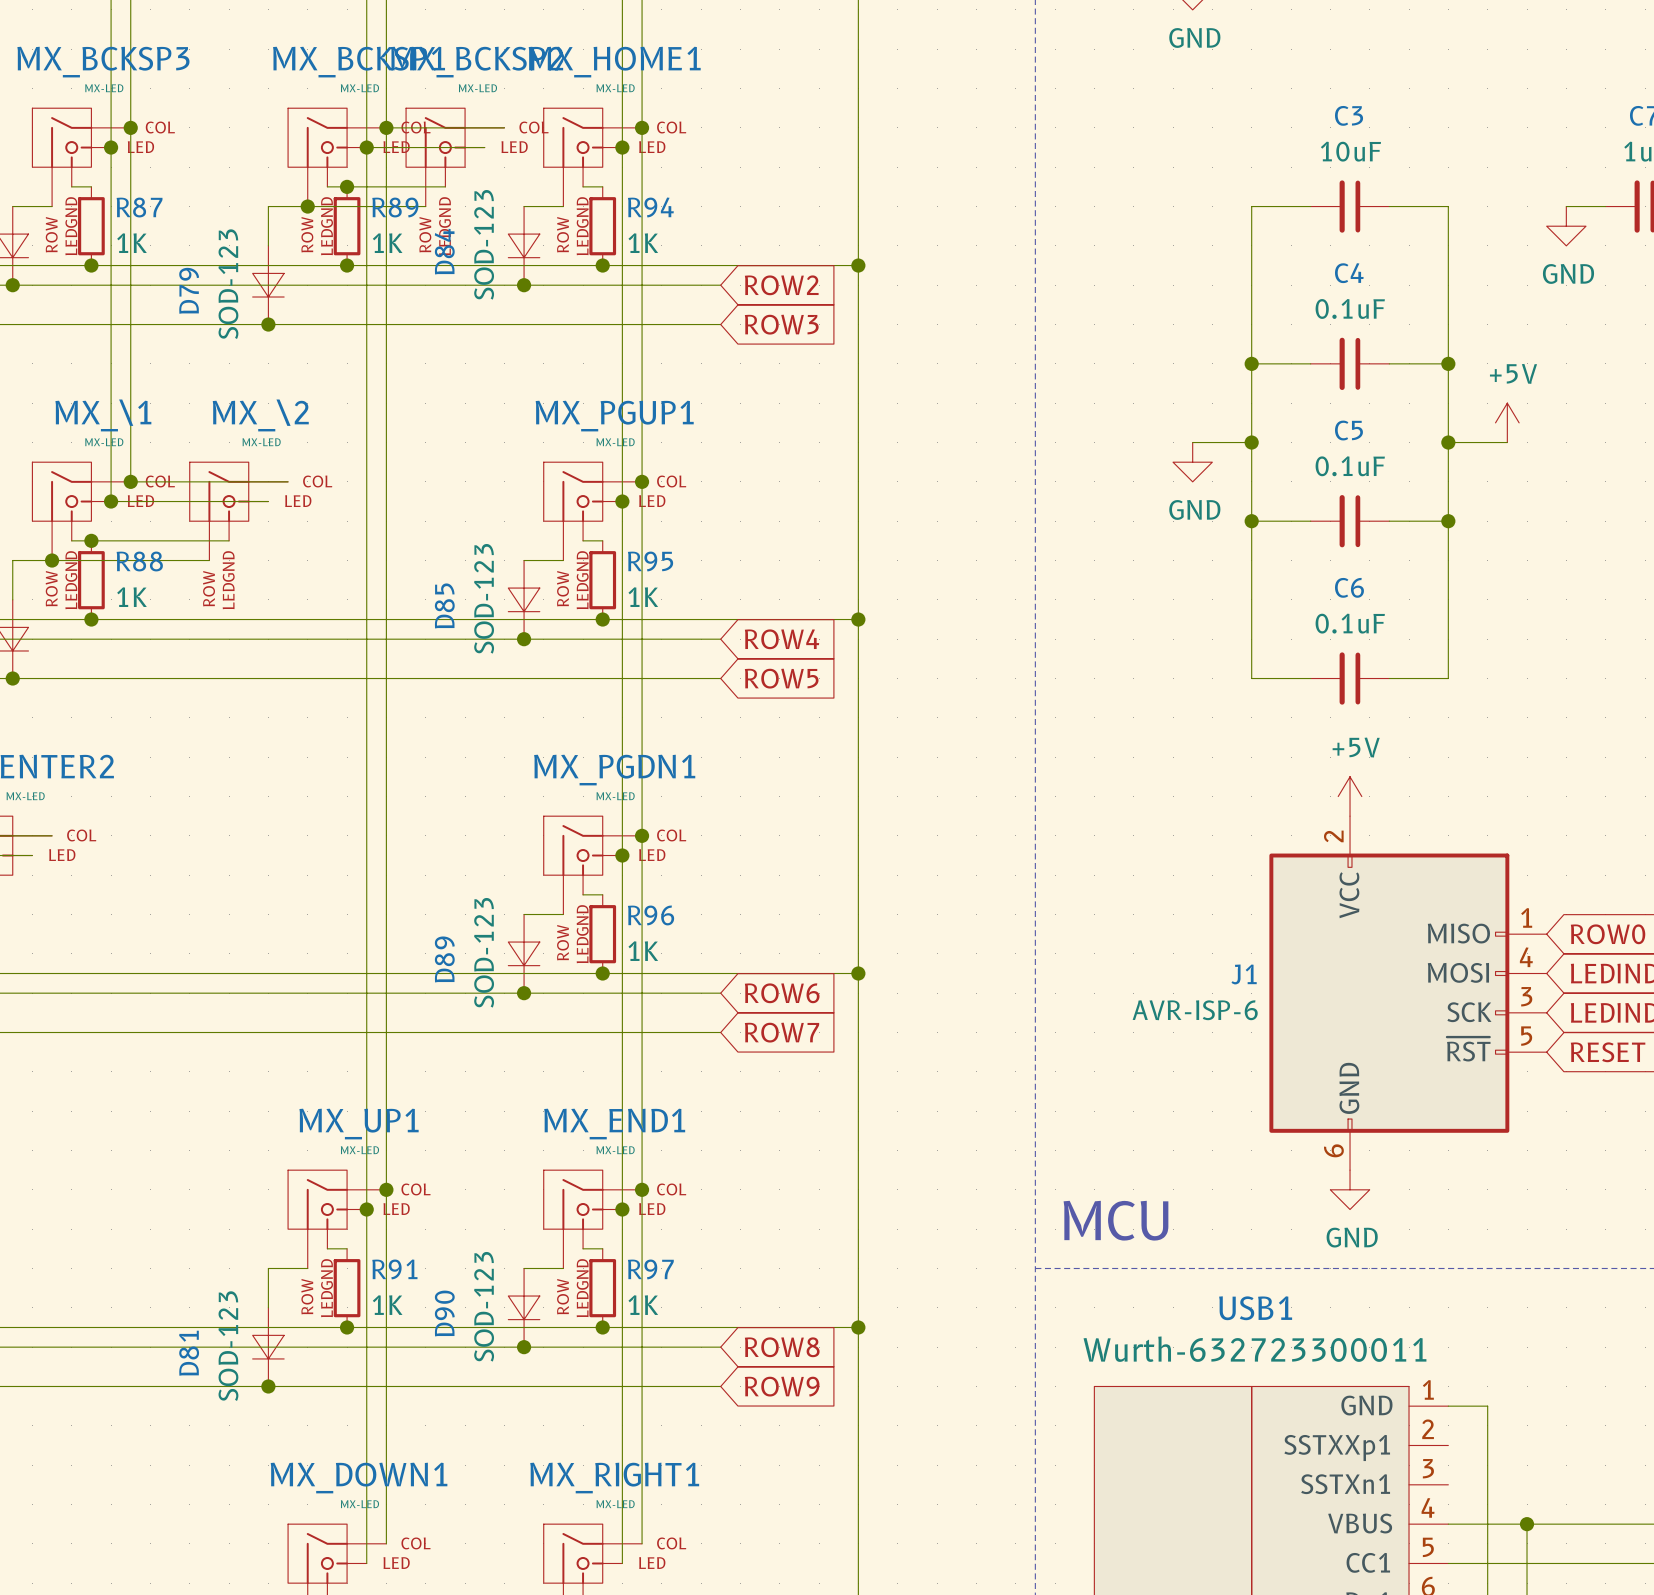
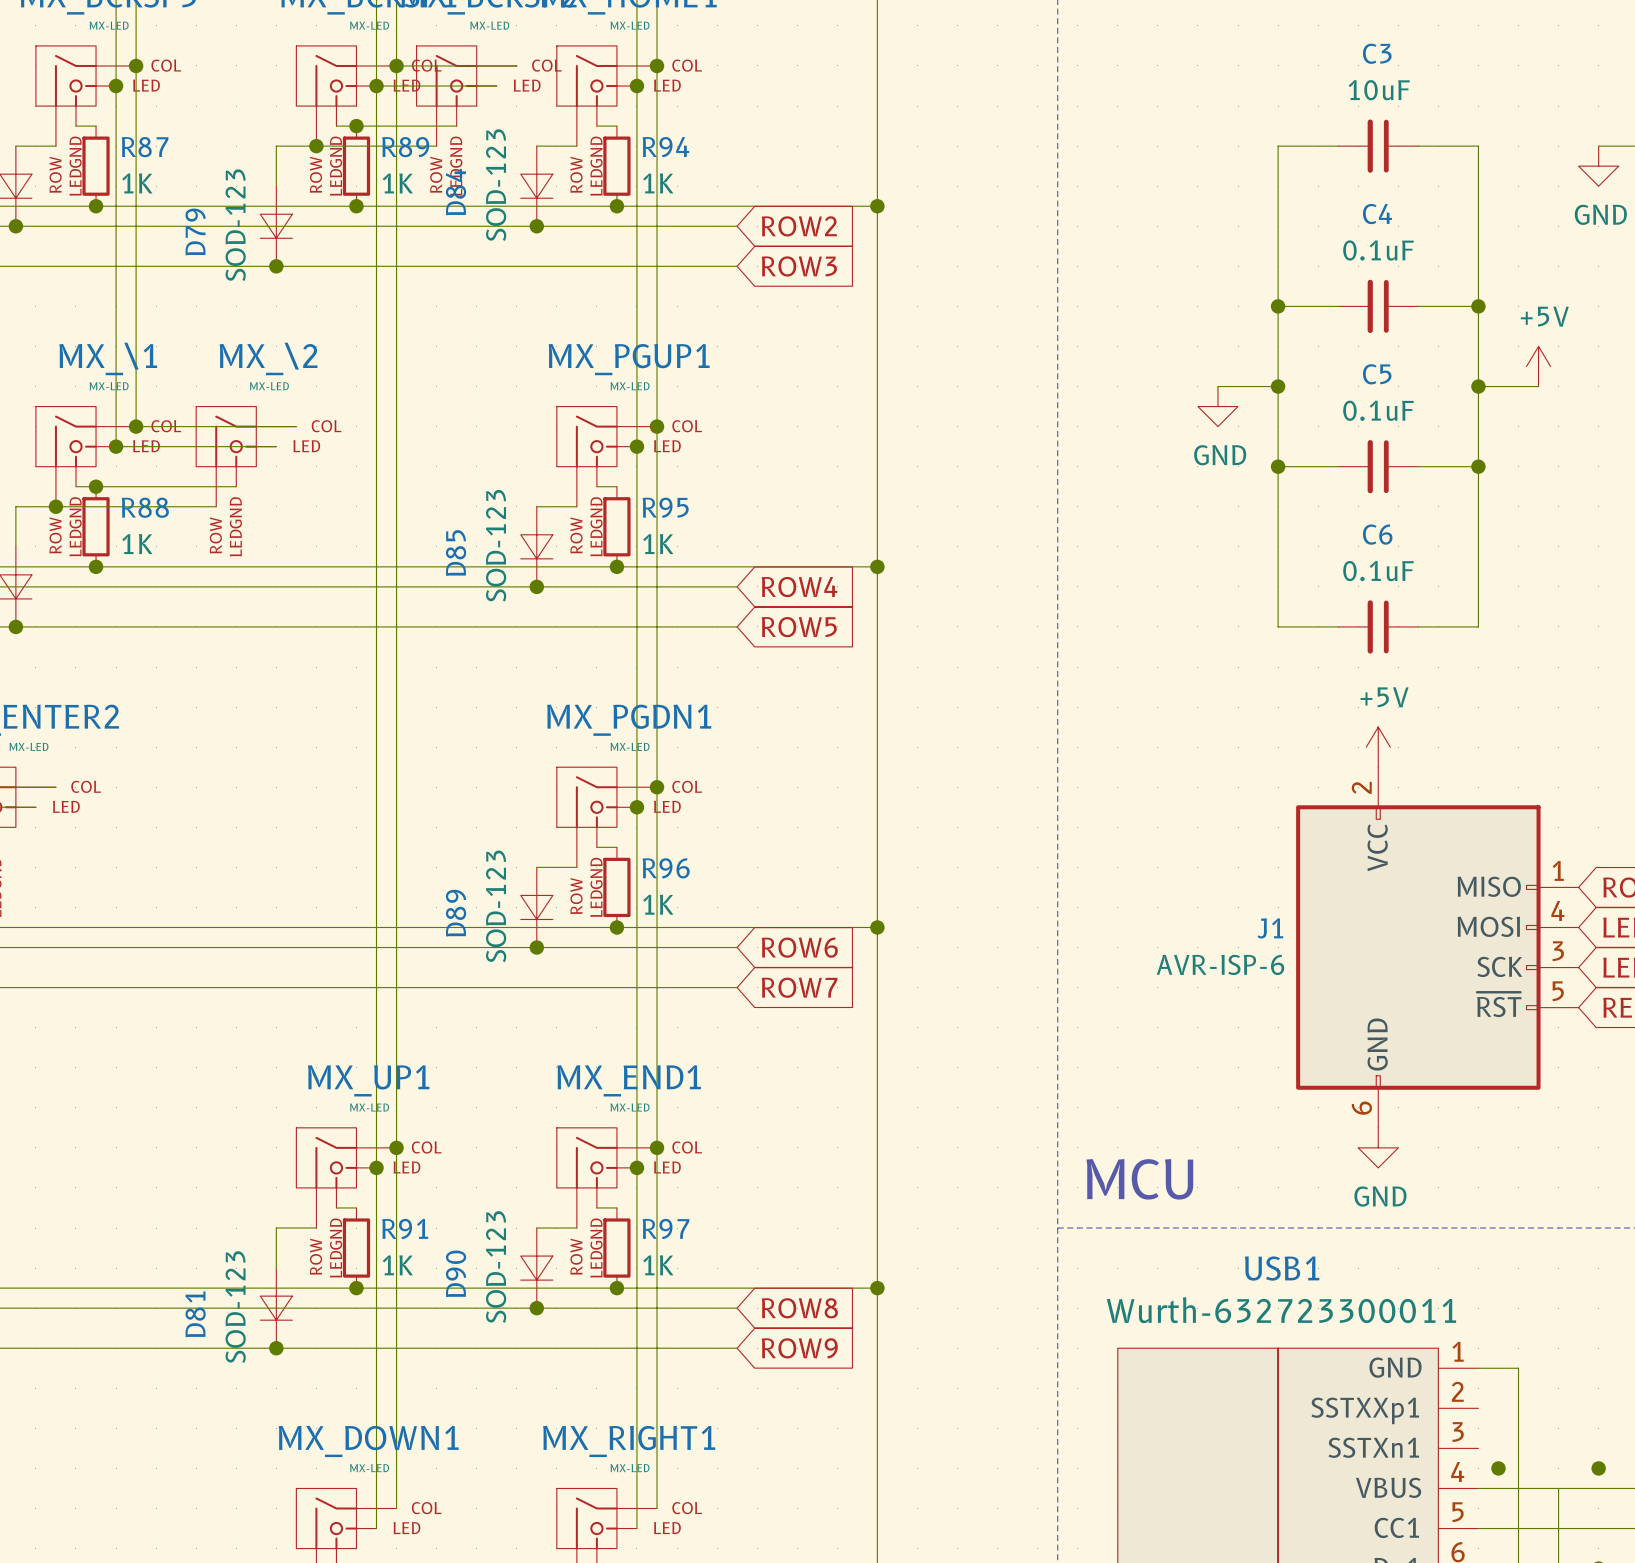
junction: none -> (1498, 1468)
junction: none -> (1598, 1468)
junction: (1527, 1524) -> none

